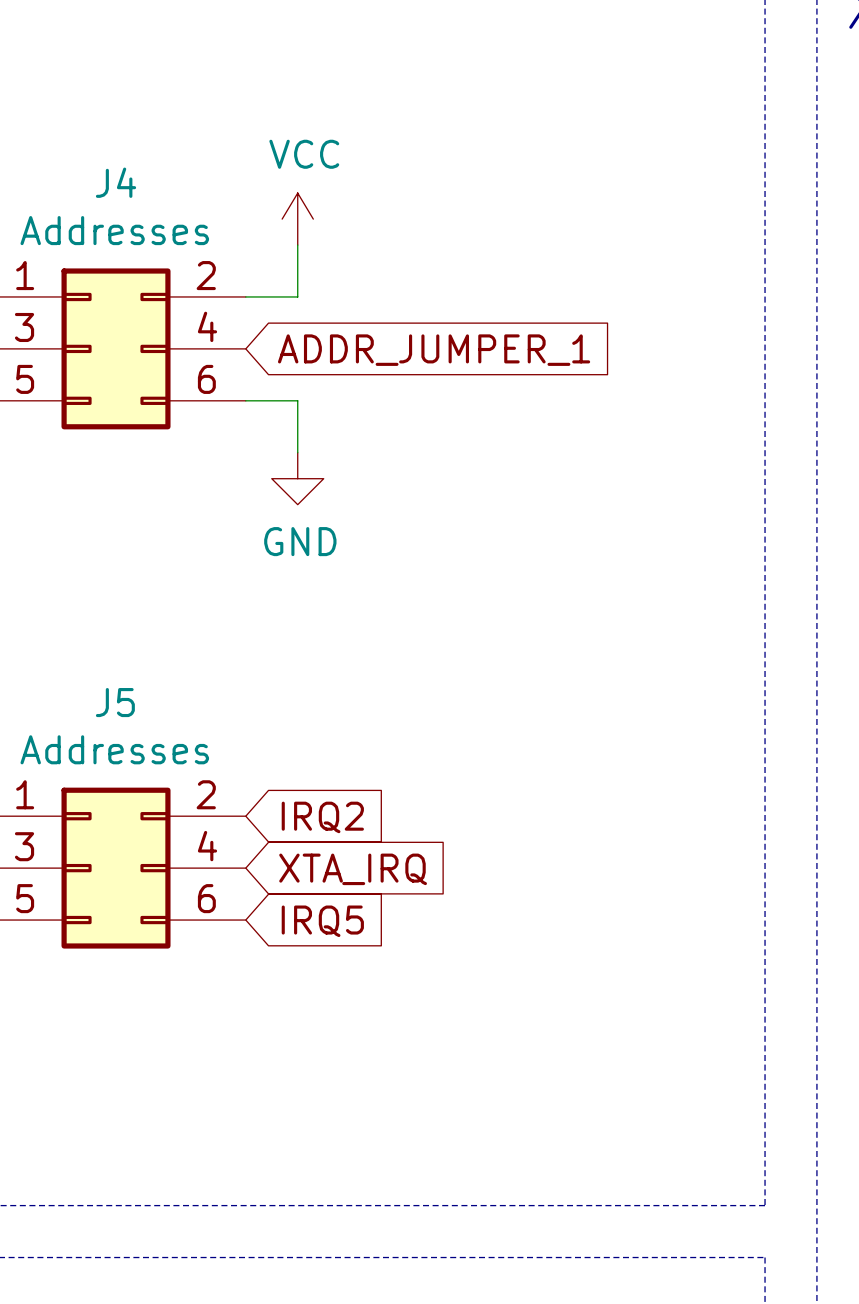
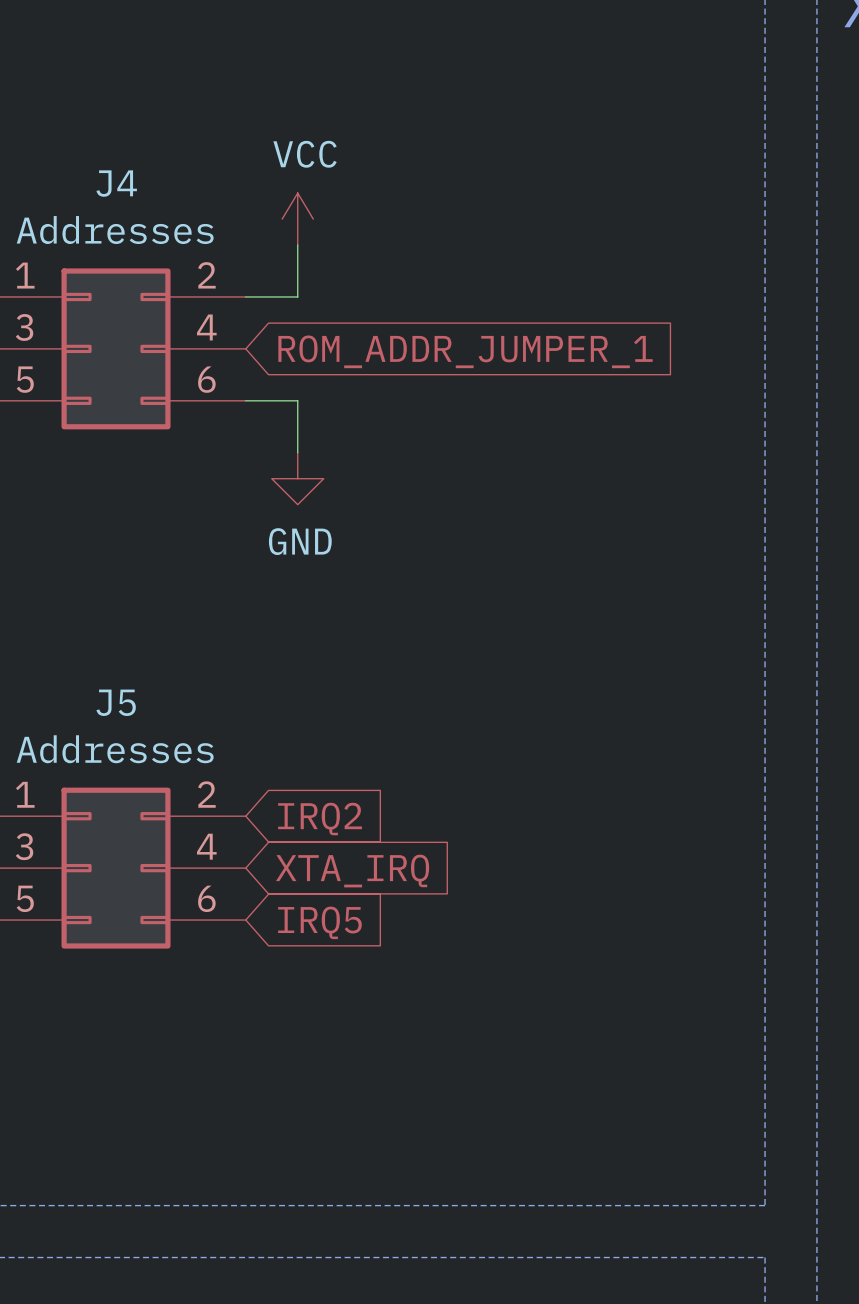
global label: ADDR_JUMPER_1 (434, 350) -> ROM_ADDR_JUMPER_1 (465, 351)

